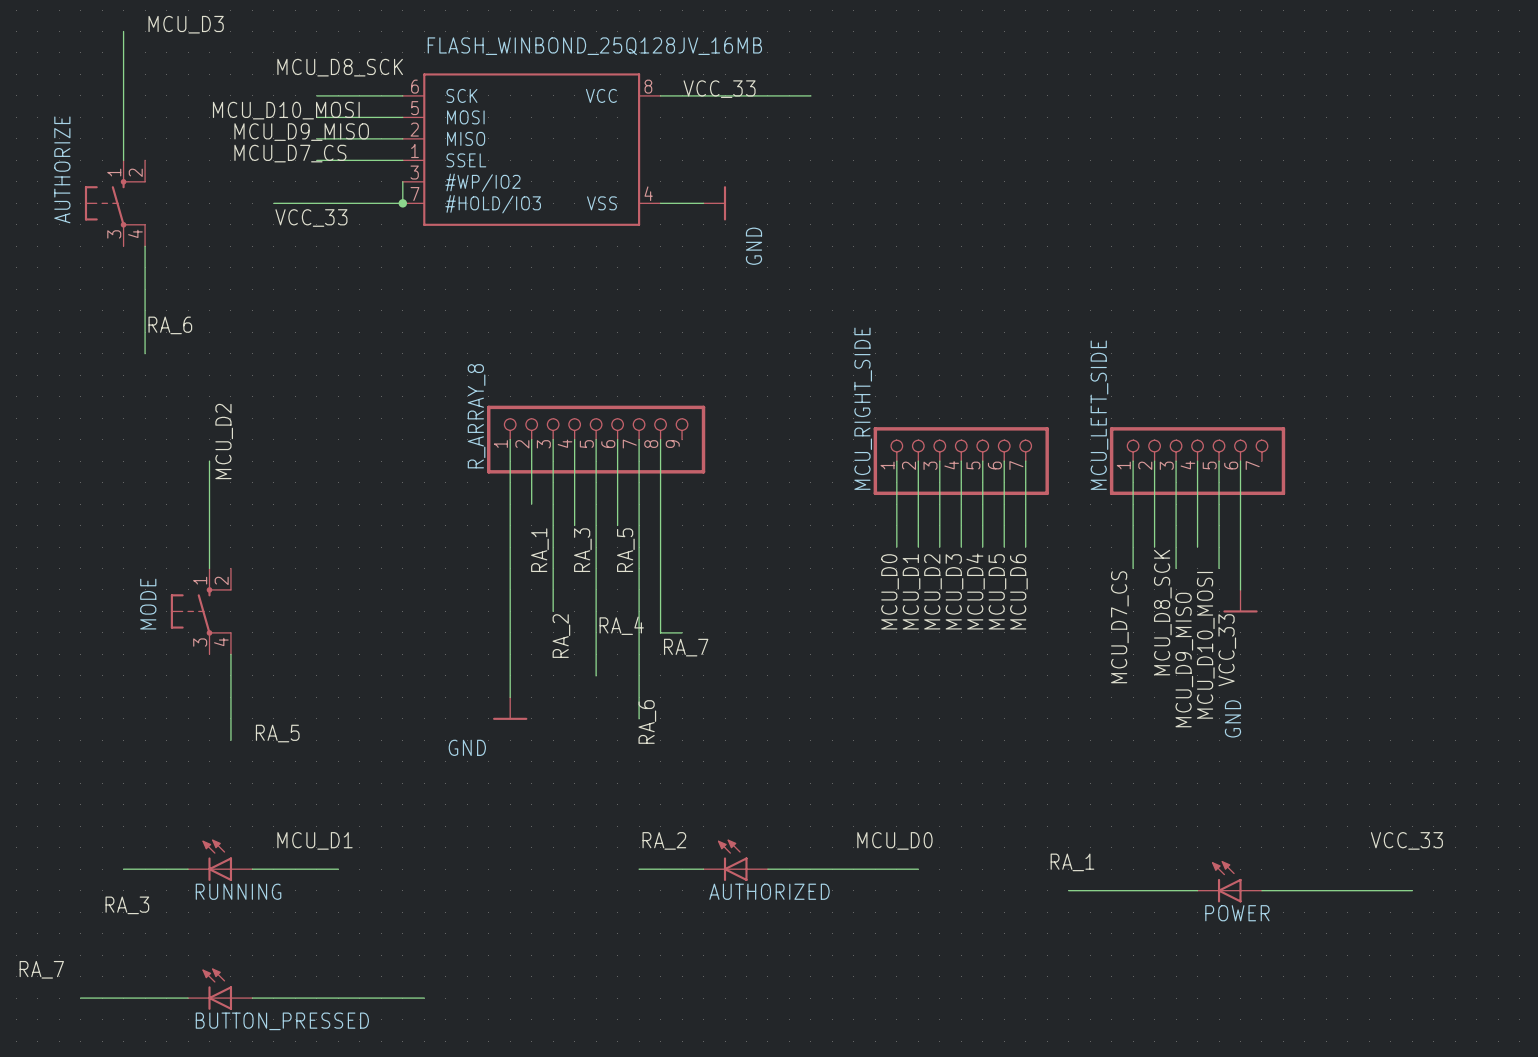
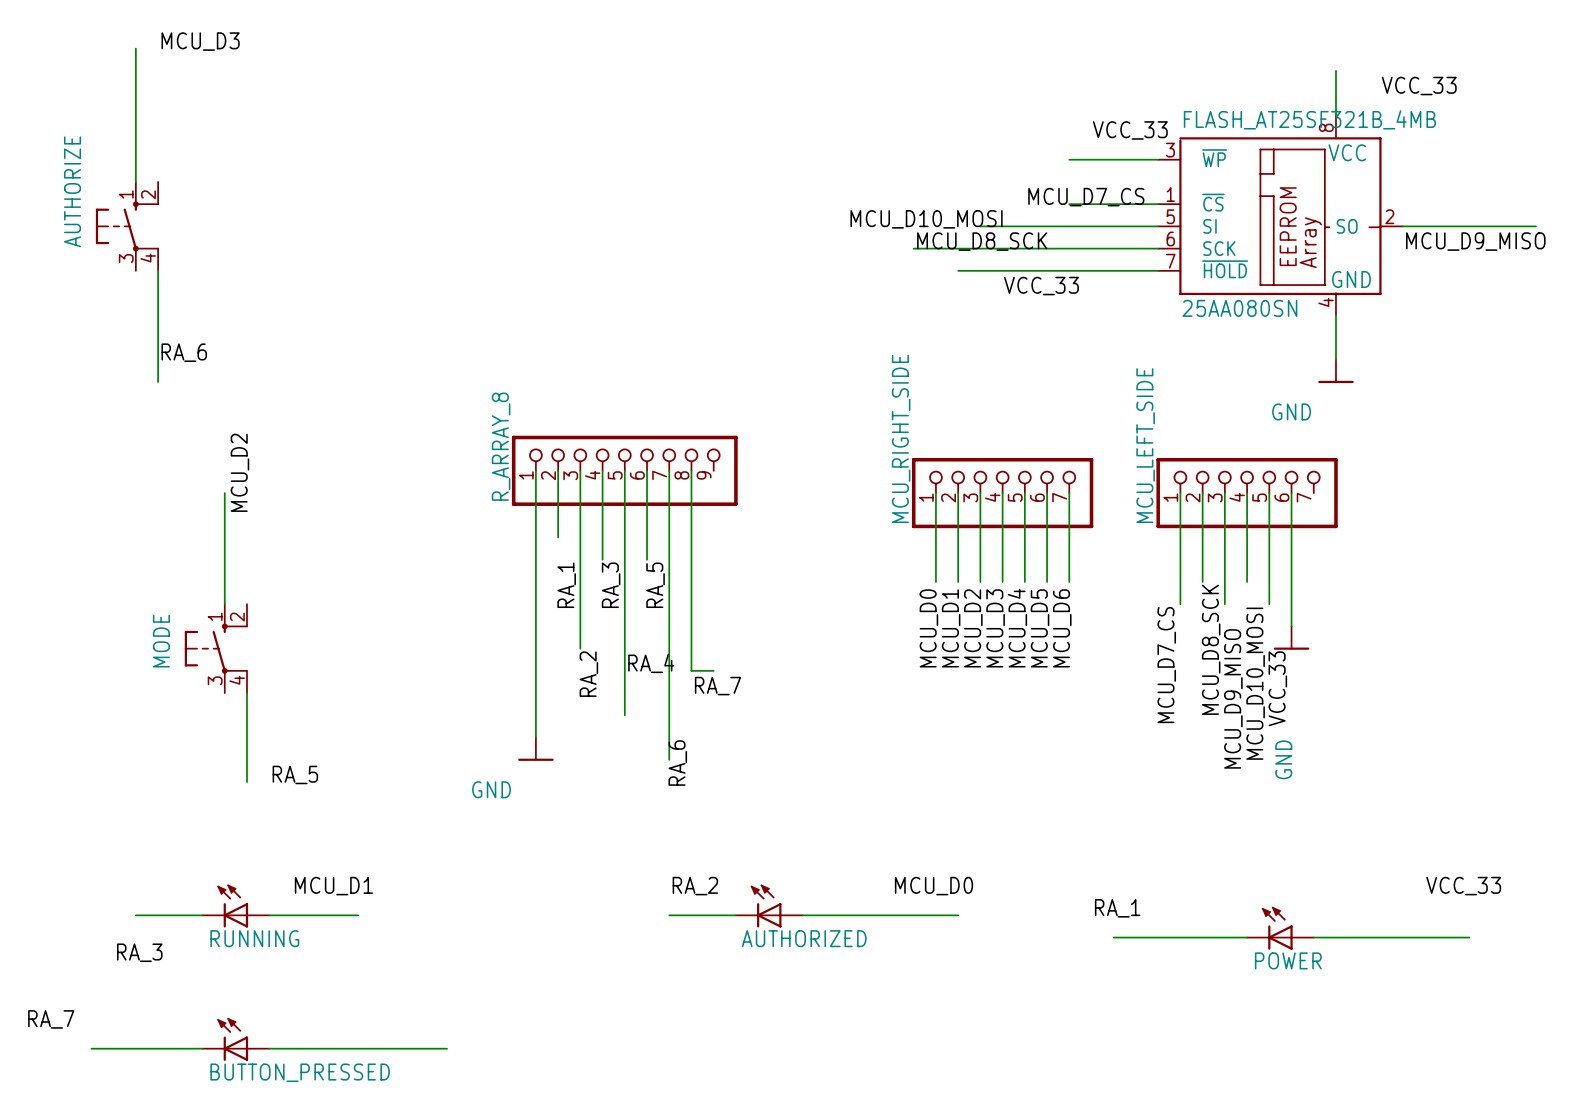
wire: none -> (1335, 70) (1335, 115)
label: MCU_D8_SCK (340, 67) -> none
label: none -> VCC_33 (1419, 86)
label: VCC_33 (719, 89) -> none
wire: (316, 95) (402, 95) -> none
wire: (660, 95) (810, 95) -> none
label: MCU_D10_MOSI (286, 110) -> none
label: none -> VCC_33 (1130, 130)
wire: (316, 117) (402, 117) -> none
label: MCU_D9_MISO (301, 132) -> none
wire: (316, 138) (402, 138) -> none
wire: none -> (1069, 159) (1158, 159)
FLASH_WINBOND_25Q128JV_16MB: (531, 149) -> none
label: MCU_D7_CS (290, 153) -> none
wire: (316, 160) (402, 160) -> none
label: none -> MCU_D7_CS (1086, 197)
wire: (402, 181) (402, 203) (273, 203) -> none
wire: none -> (1069, 204) (1158, 204)
FLASH_AT25SF321B_4MB: none -> 25AA080SN (1280, 215)
label: none -> MCU_D10_MOSI (926, 219)
junction: (402, 203) -> none
wire: (660, 203) (703, 203) -> none
power symbol: GND (714, 203) -> none
wire: none -> (980, 226) (1158, 226)
wire: none -> (1402, 226) (1536, 226)
label: VCC_33 (311, 218) -> none
label: none -> MCU_D8_SCK (982, 241)
label: none -> MCU_D9_MISO (1475, 241)
wire: none -> (913, 248) (1158, 248)
wire: none -> (958, 270) (1158, 270)
label: none -> VCC_33 (1041, 286)
wire: none -> (1335, 315) (1335, 359)
power symbol: none -> GND (1335, 371)

